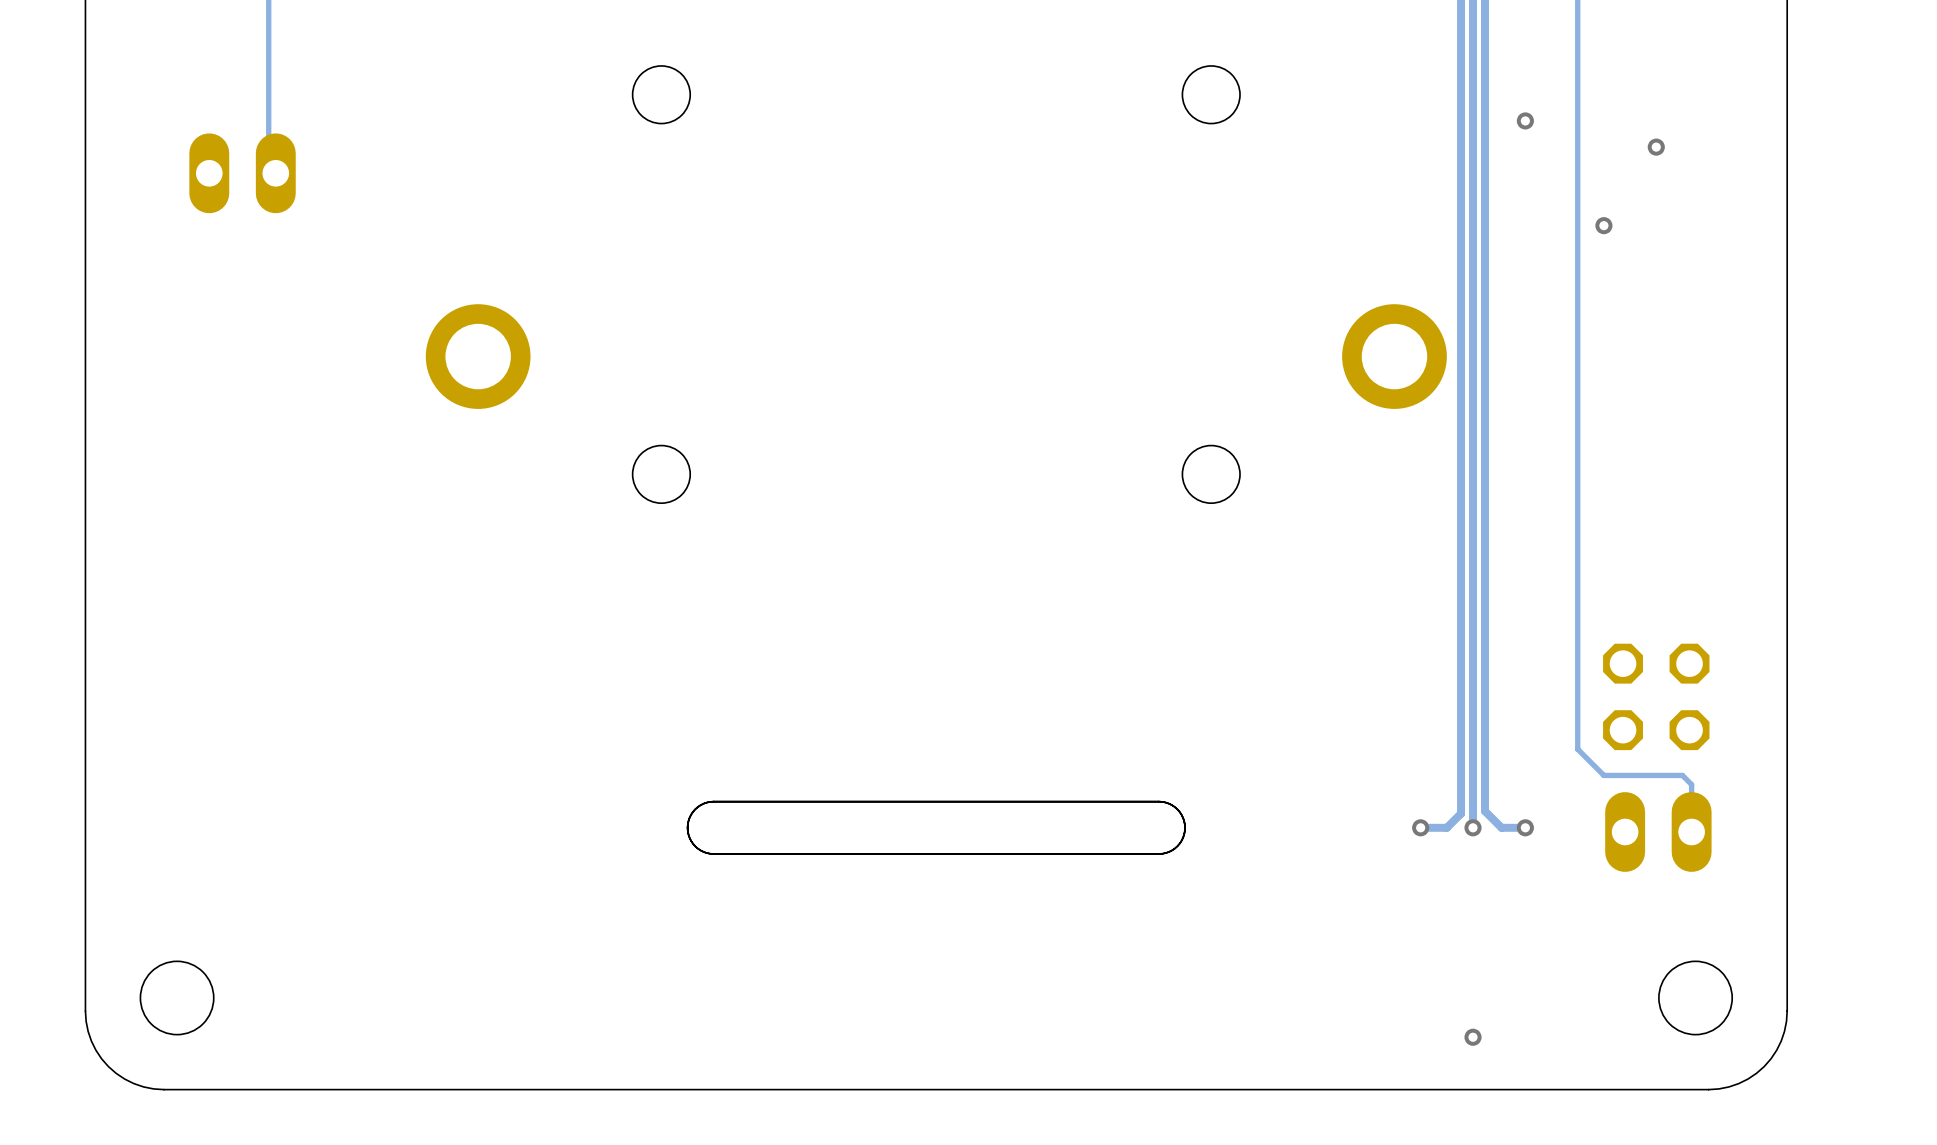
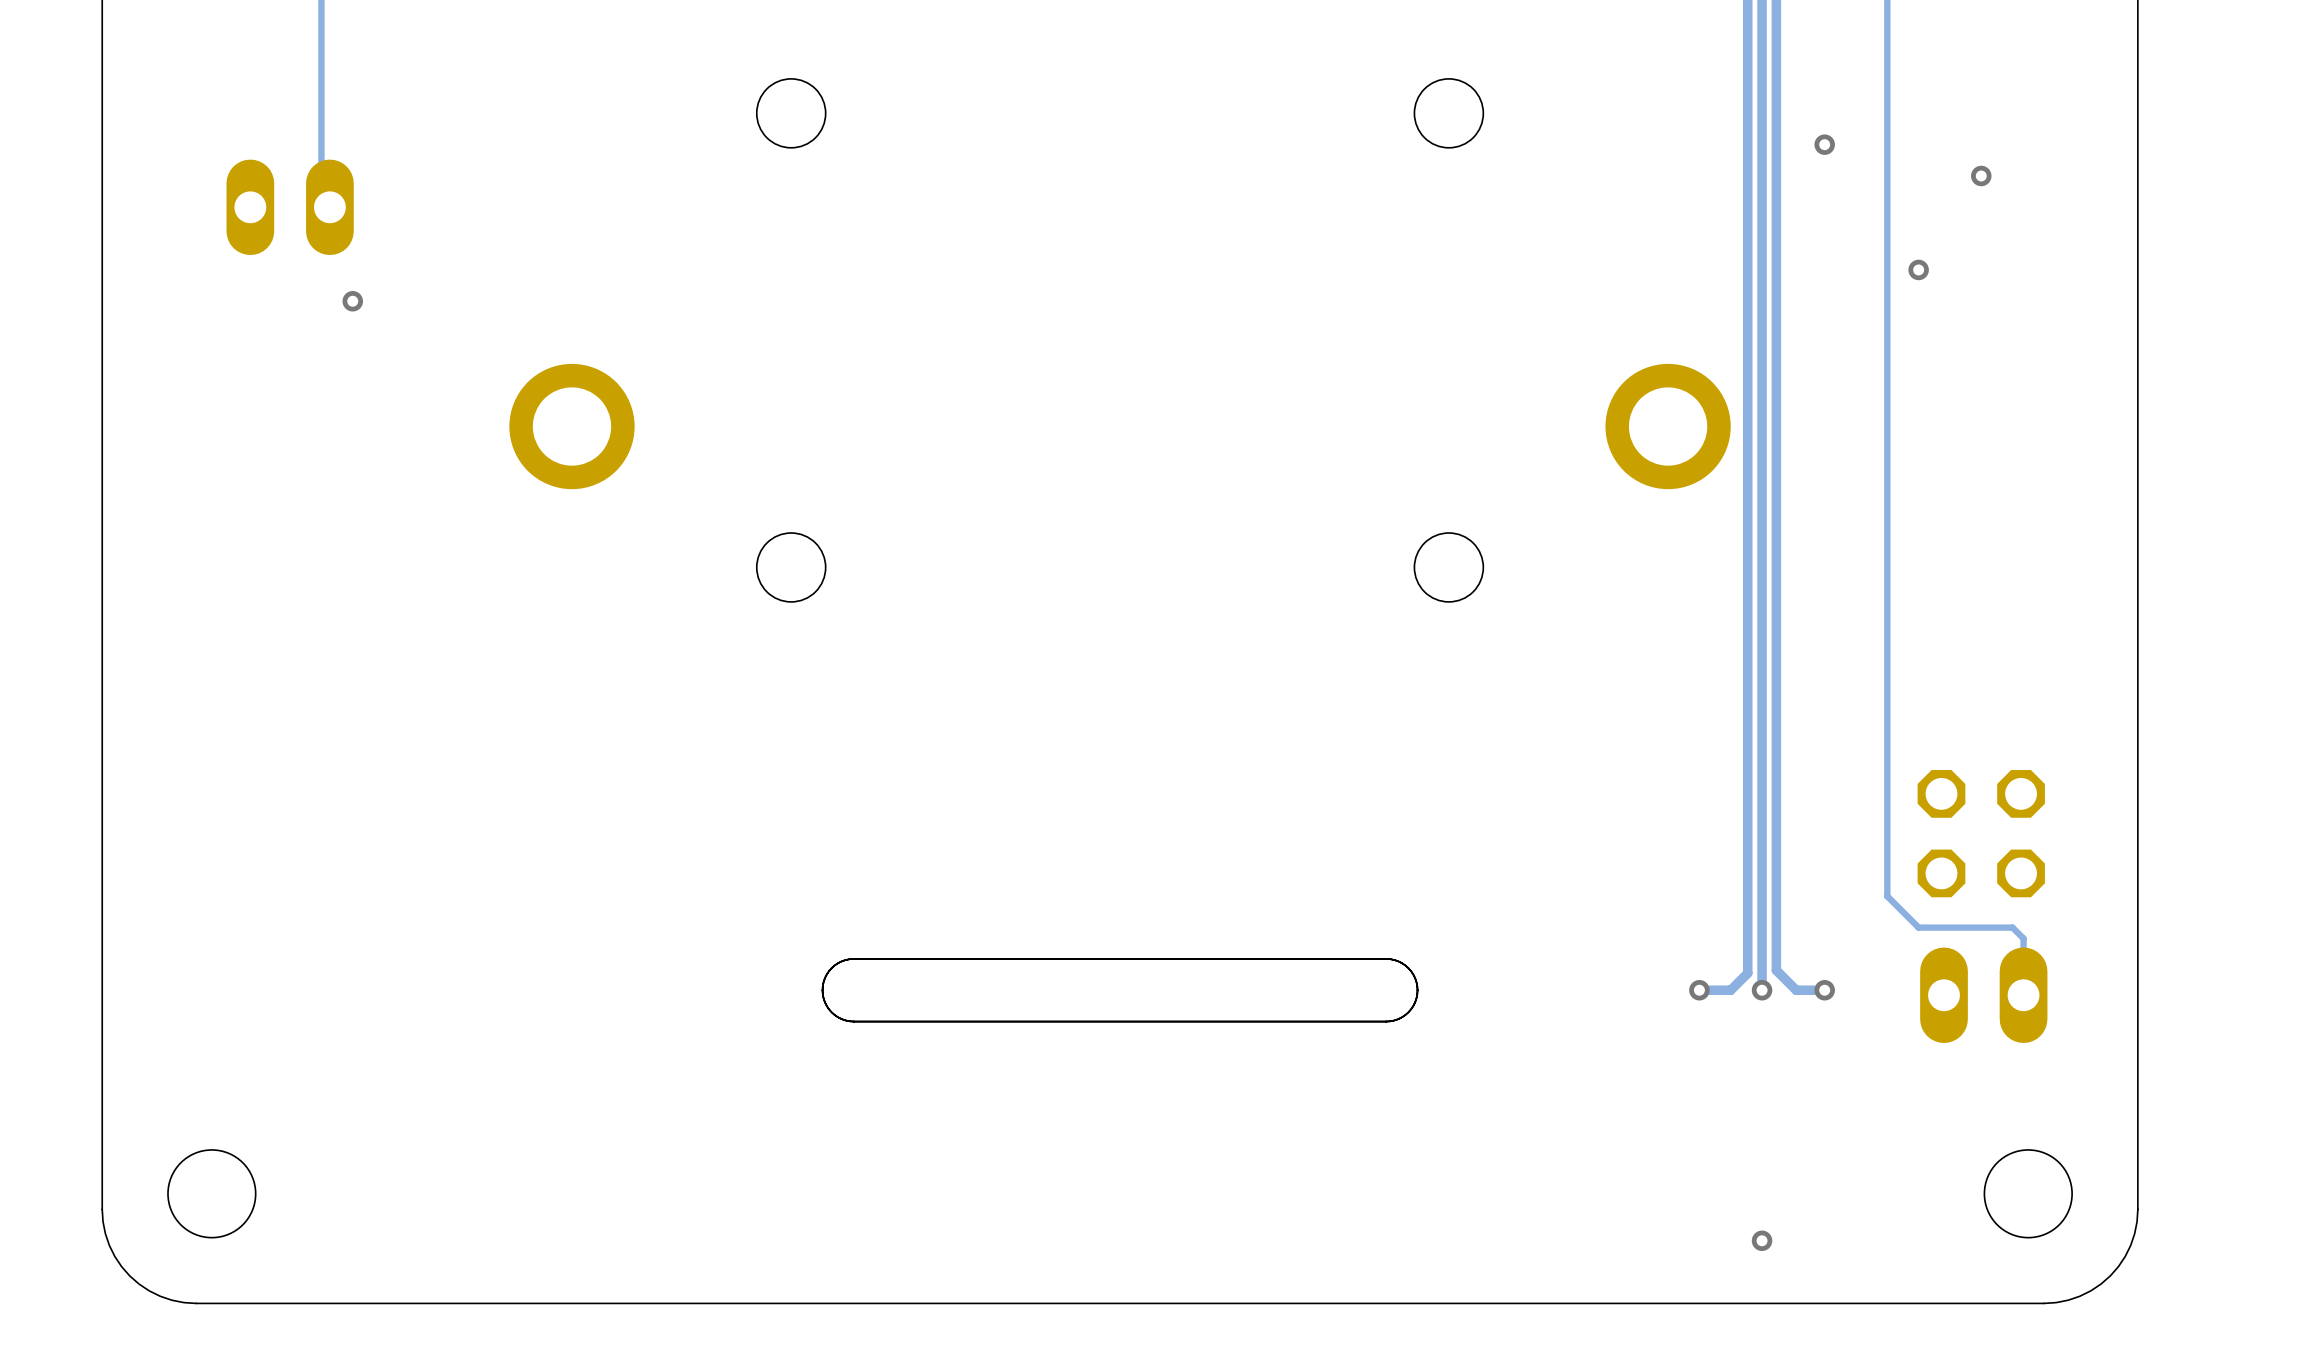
via: none -> (352, 301)

